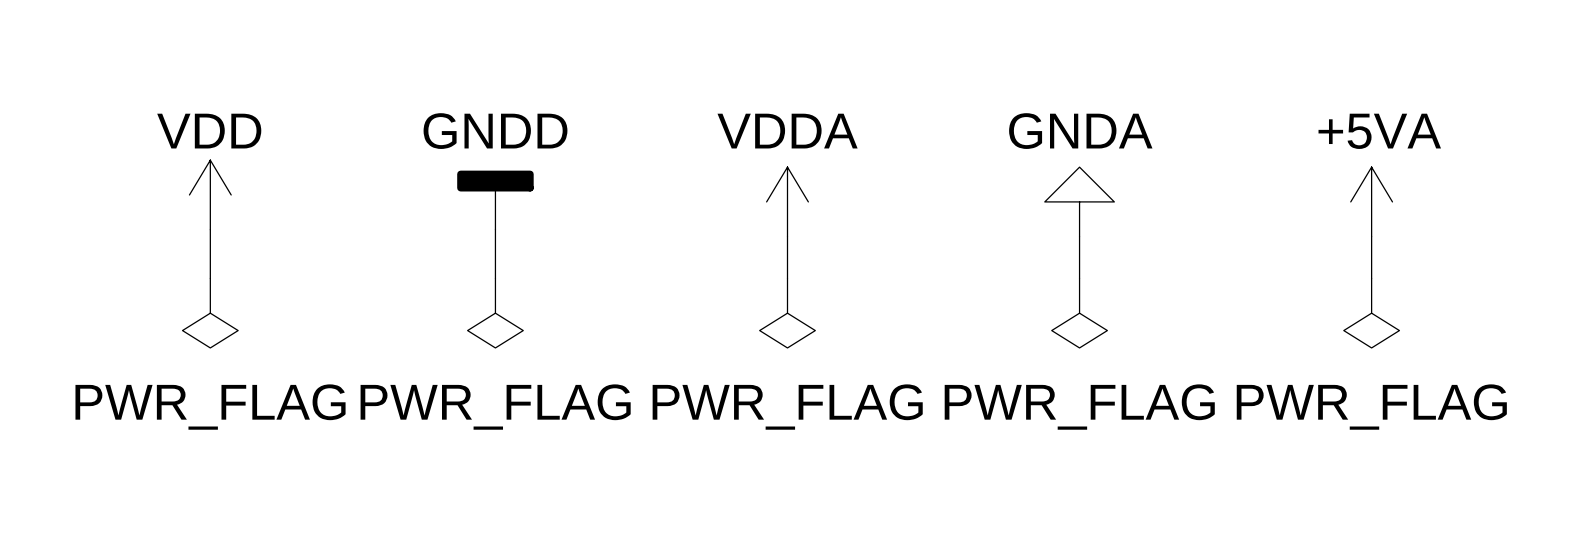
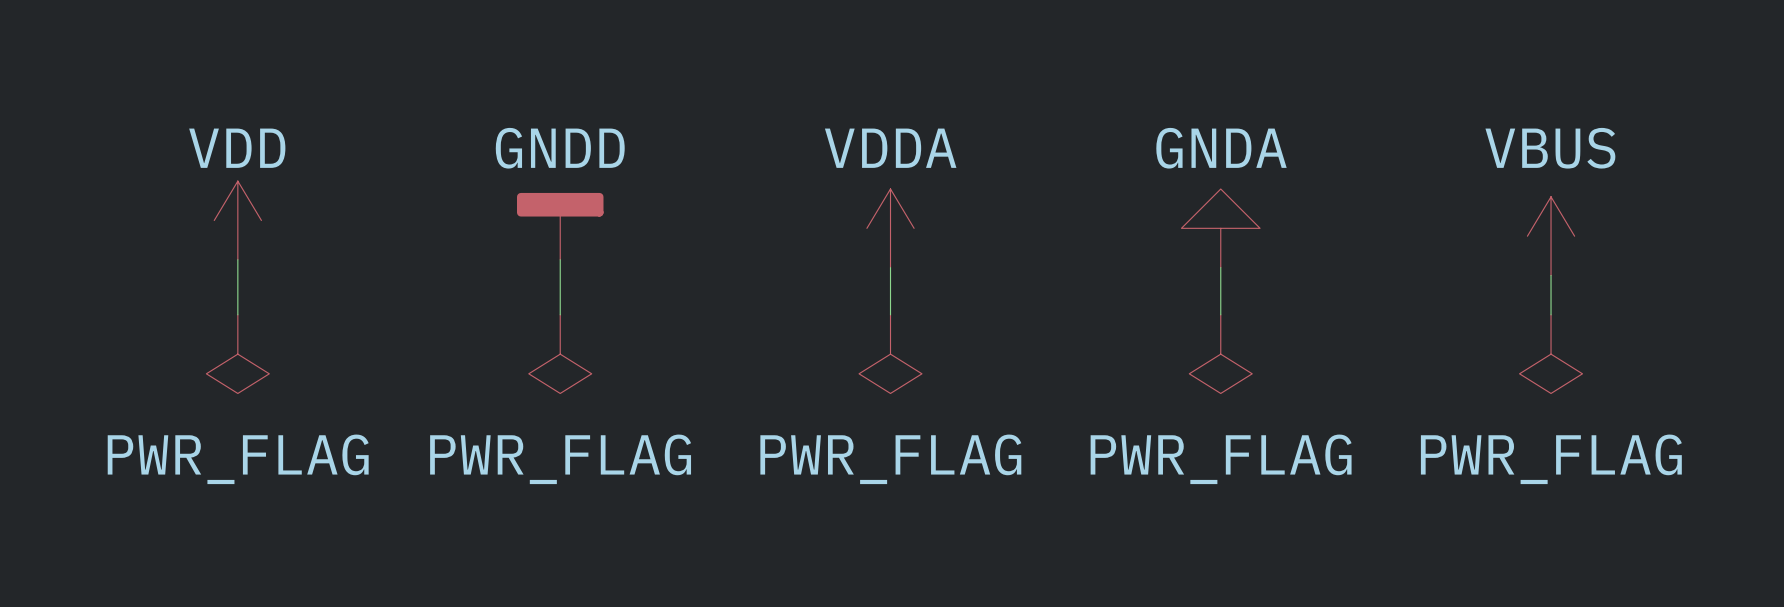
power symbol: +5VA (1371, 201) -> VBUS (1551, 236)

